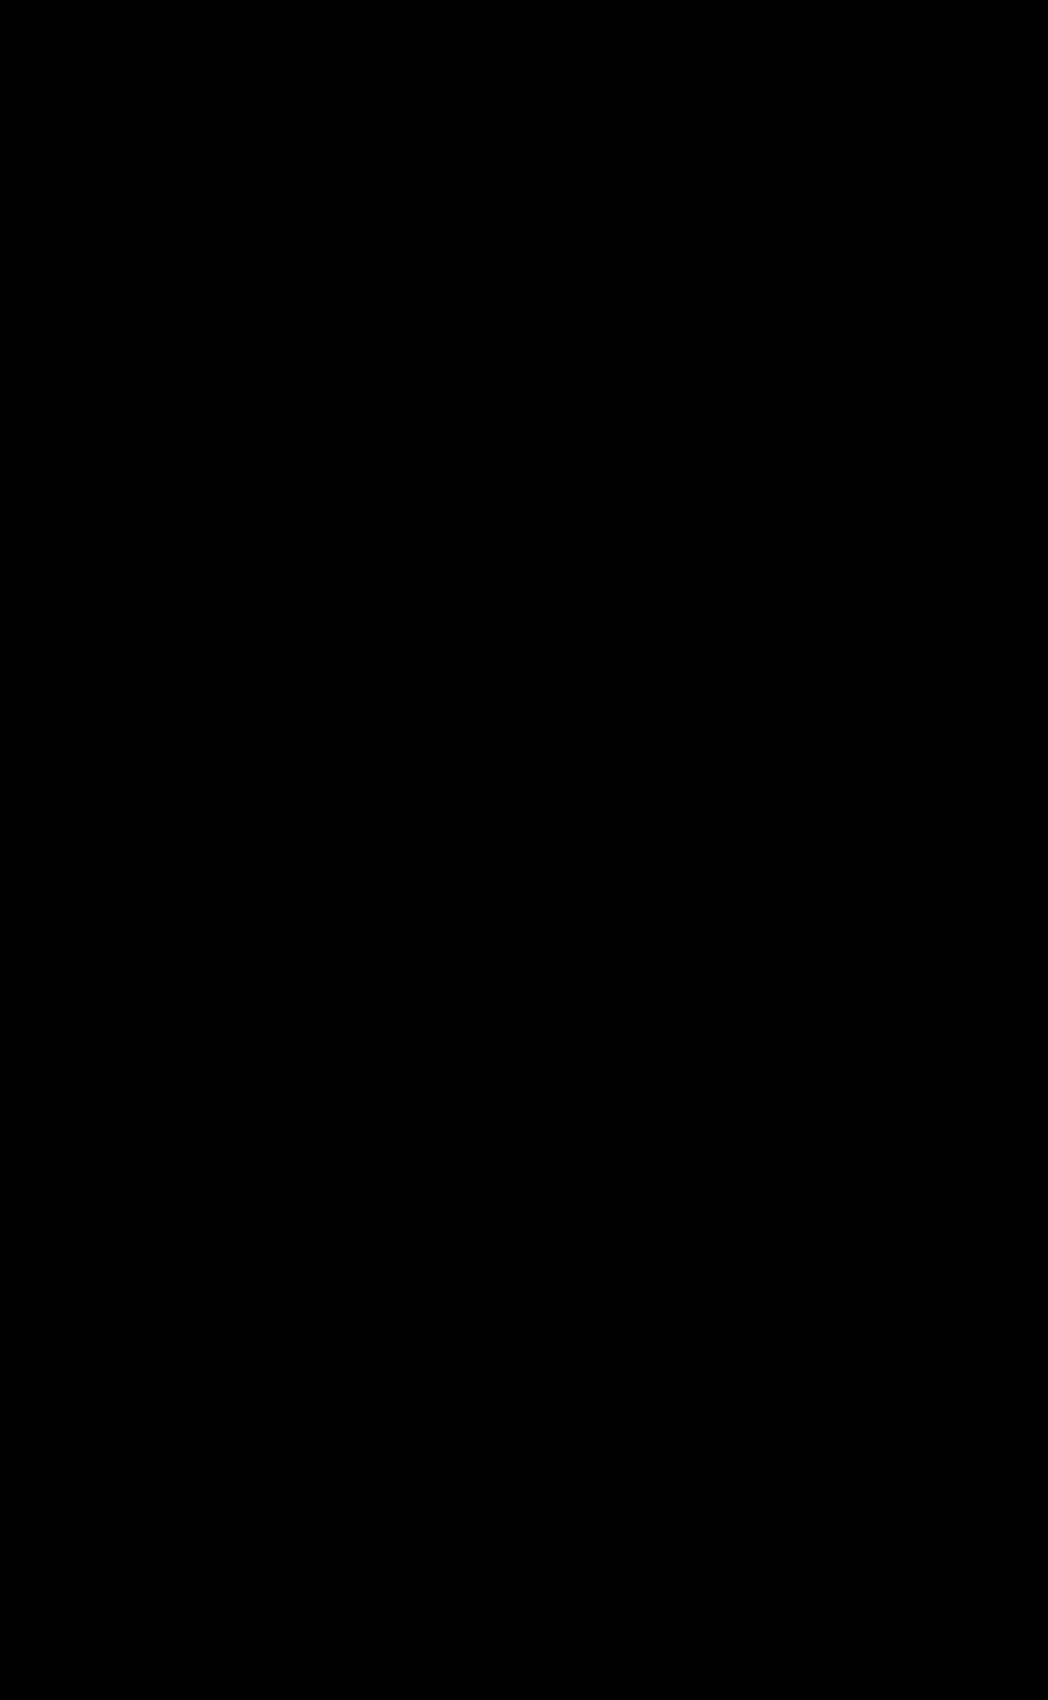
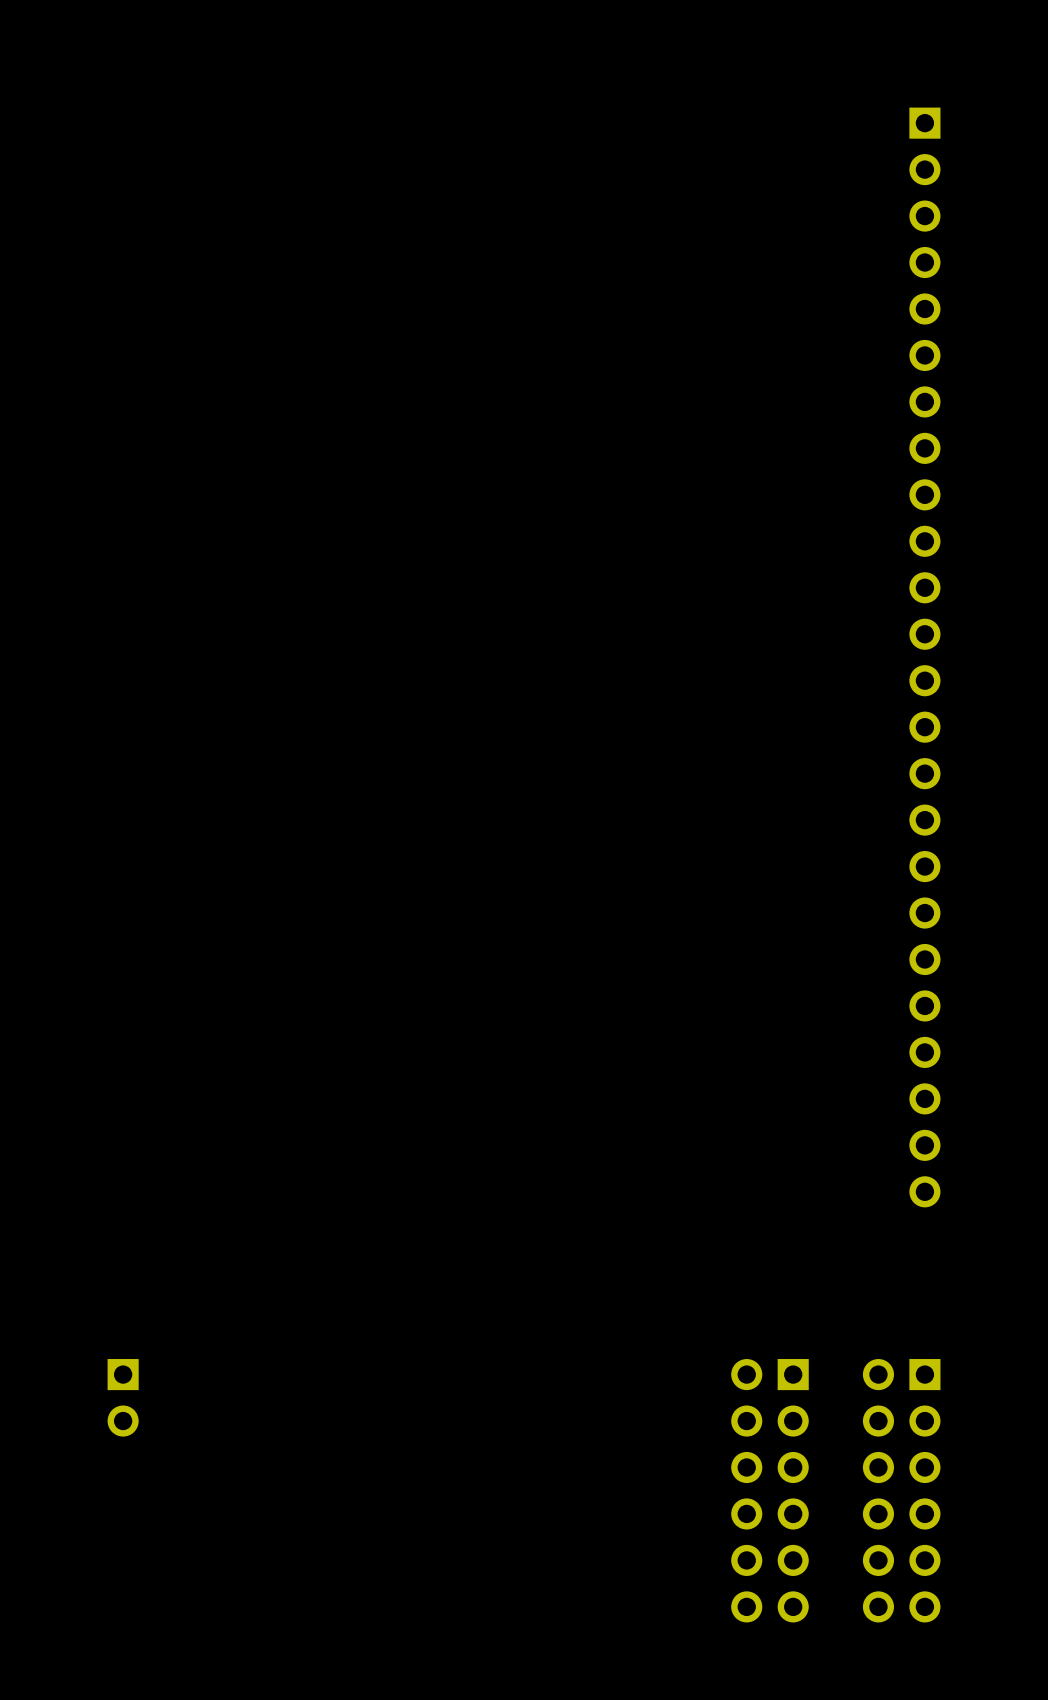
part: none -> (924, 657)
part: none -> (123, 1397)
part: none -> (769, 1490)
part: none -> (901, 1490)

